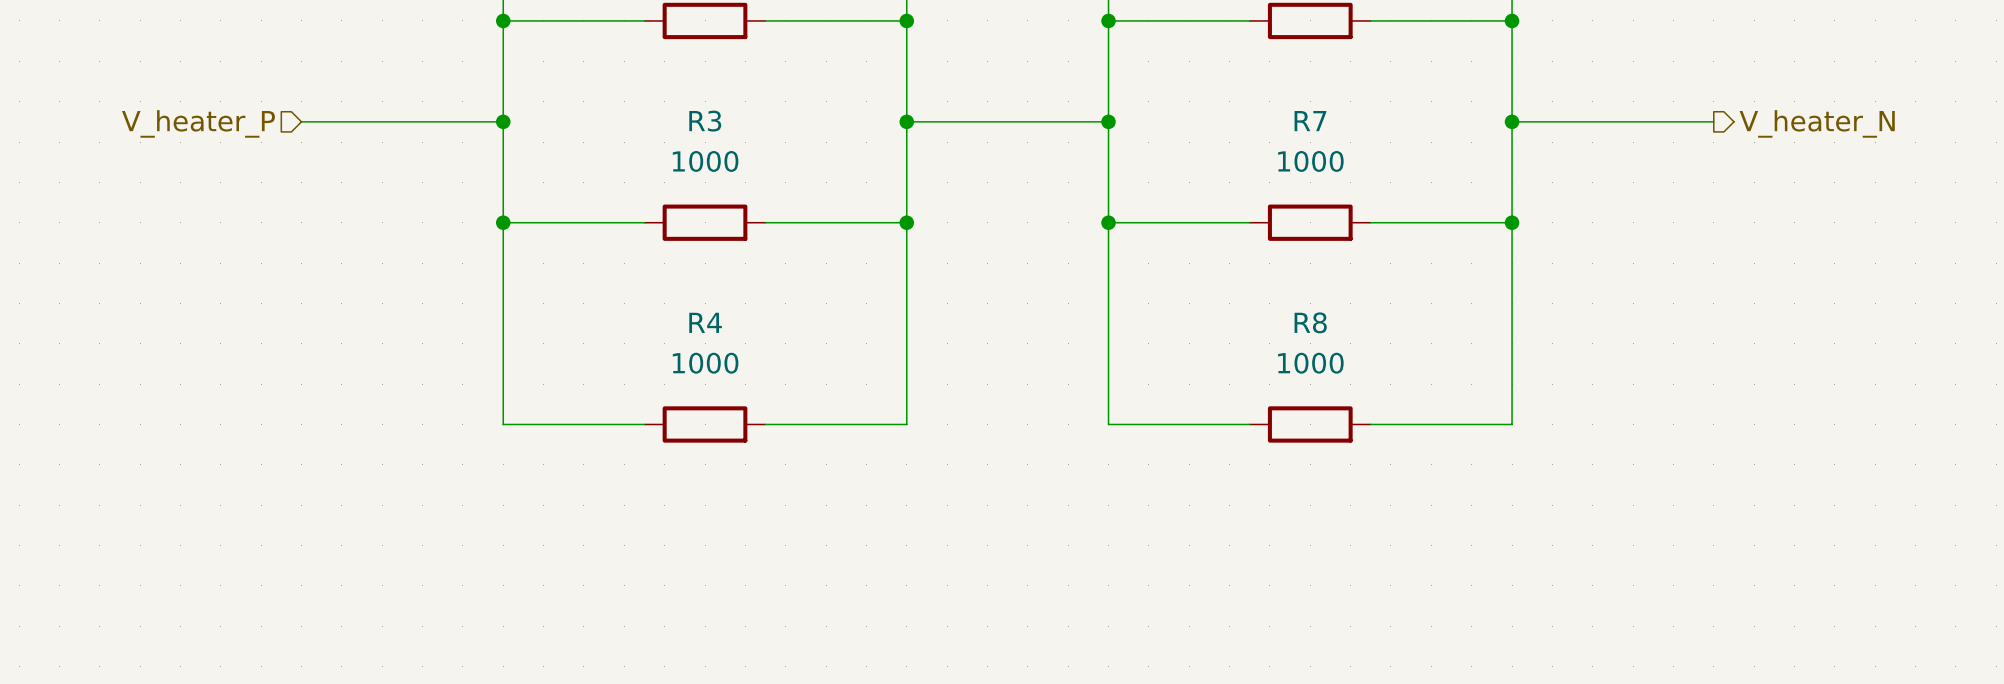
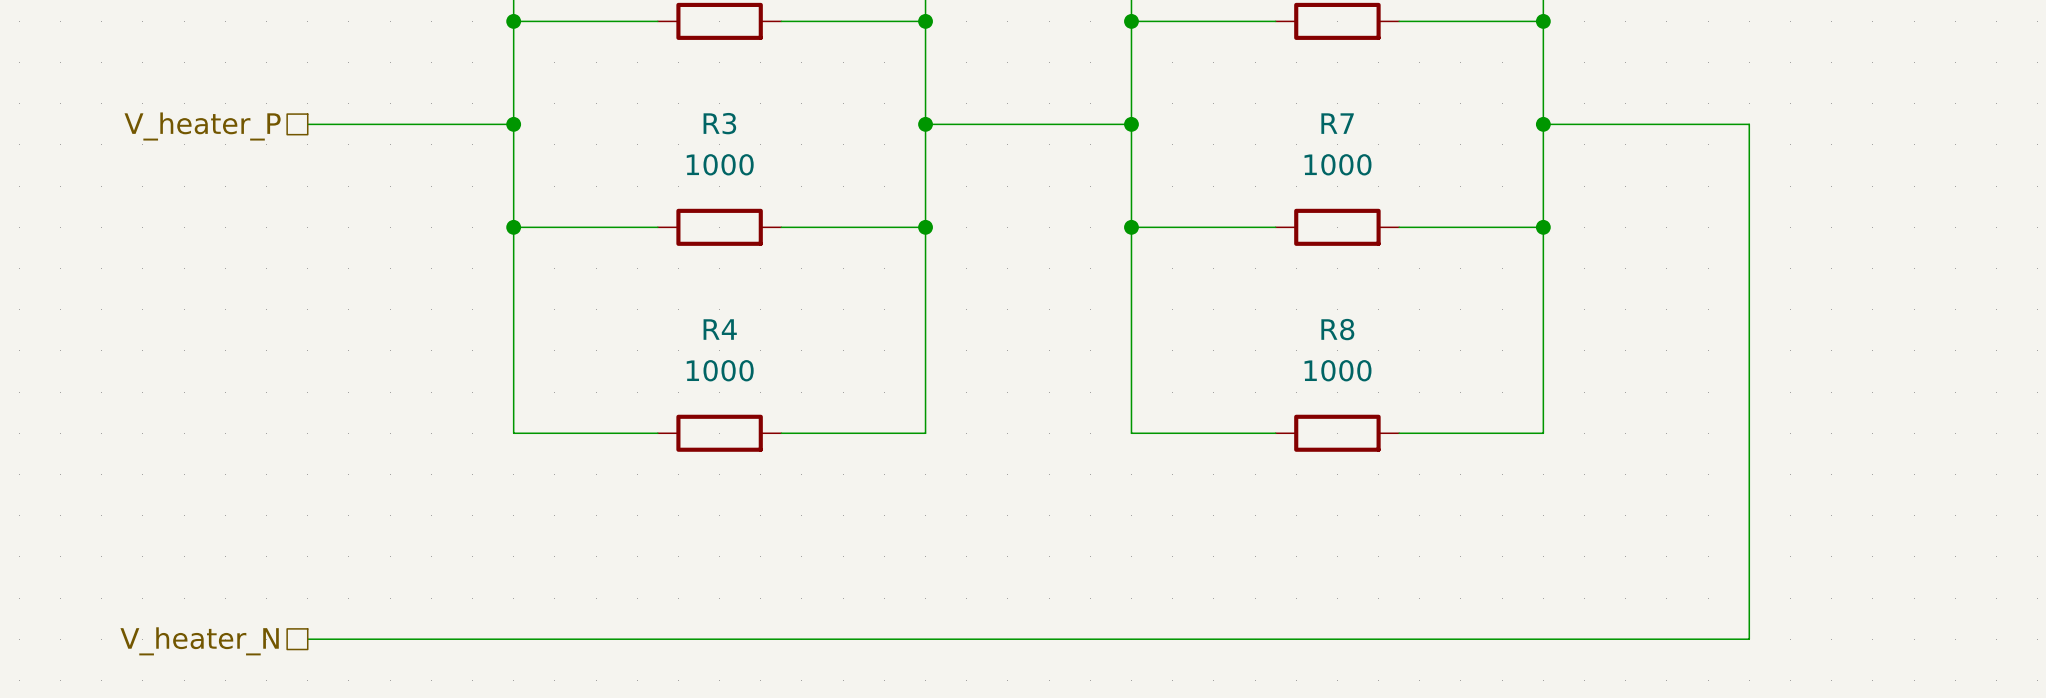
wire: none -> (1749, 124) (1749, 639) (307, 639)
hierarchical label shape: input (198, 123) -> passive (202, 126)
hierarchical label: V_heater_N (1817, 123) -> none
hierarchical label: none -> V_heater_N (199, 641)

